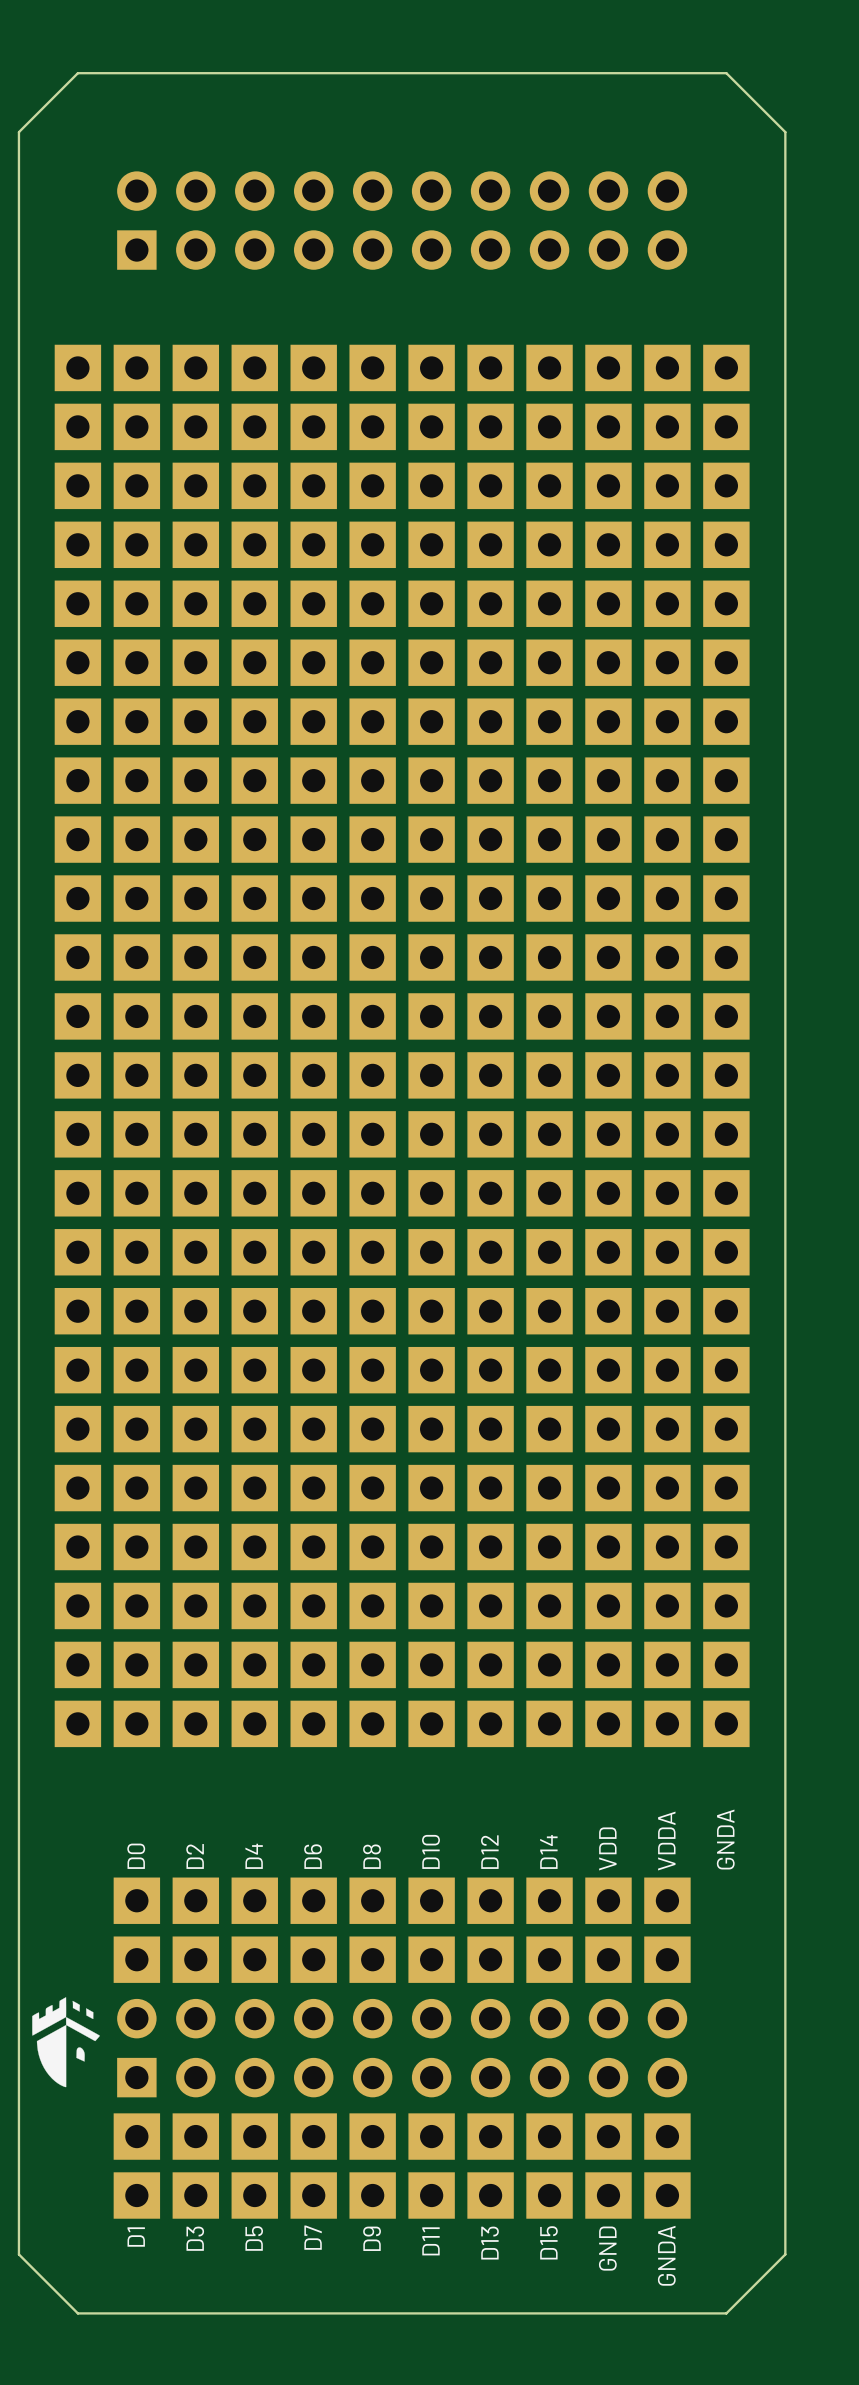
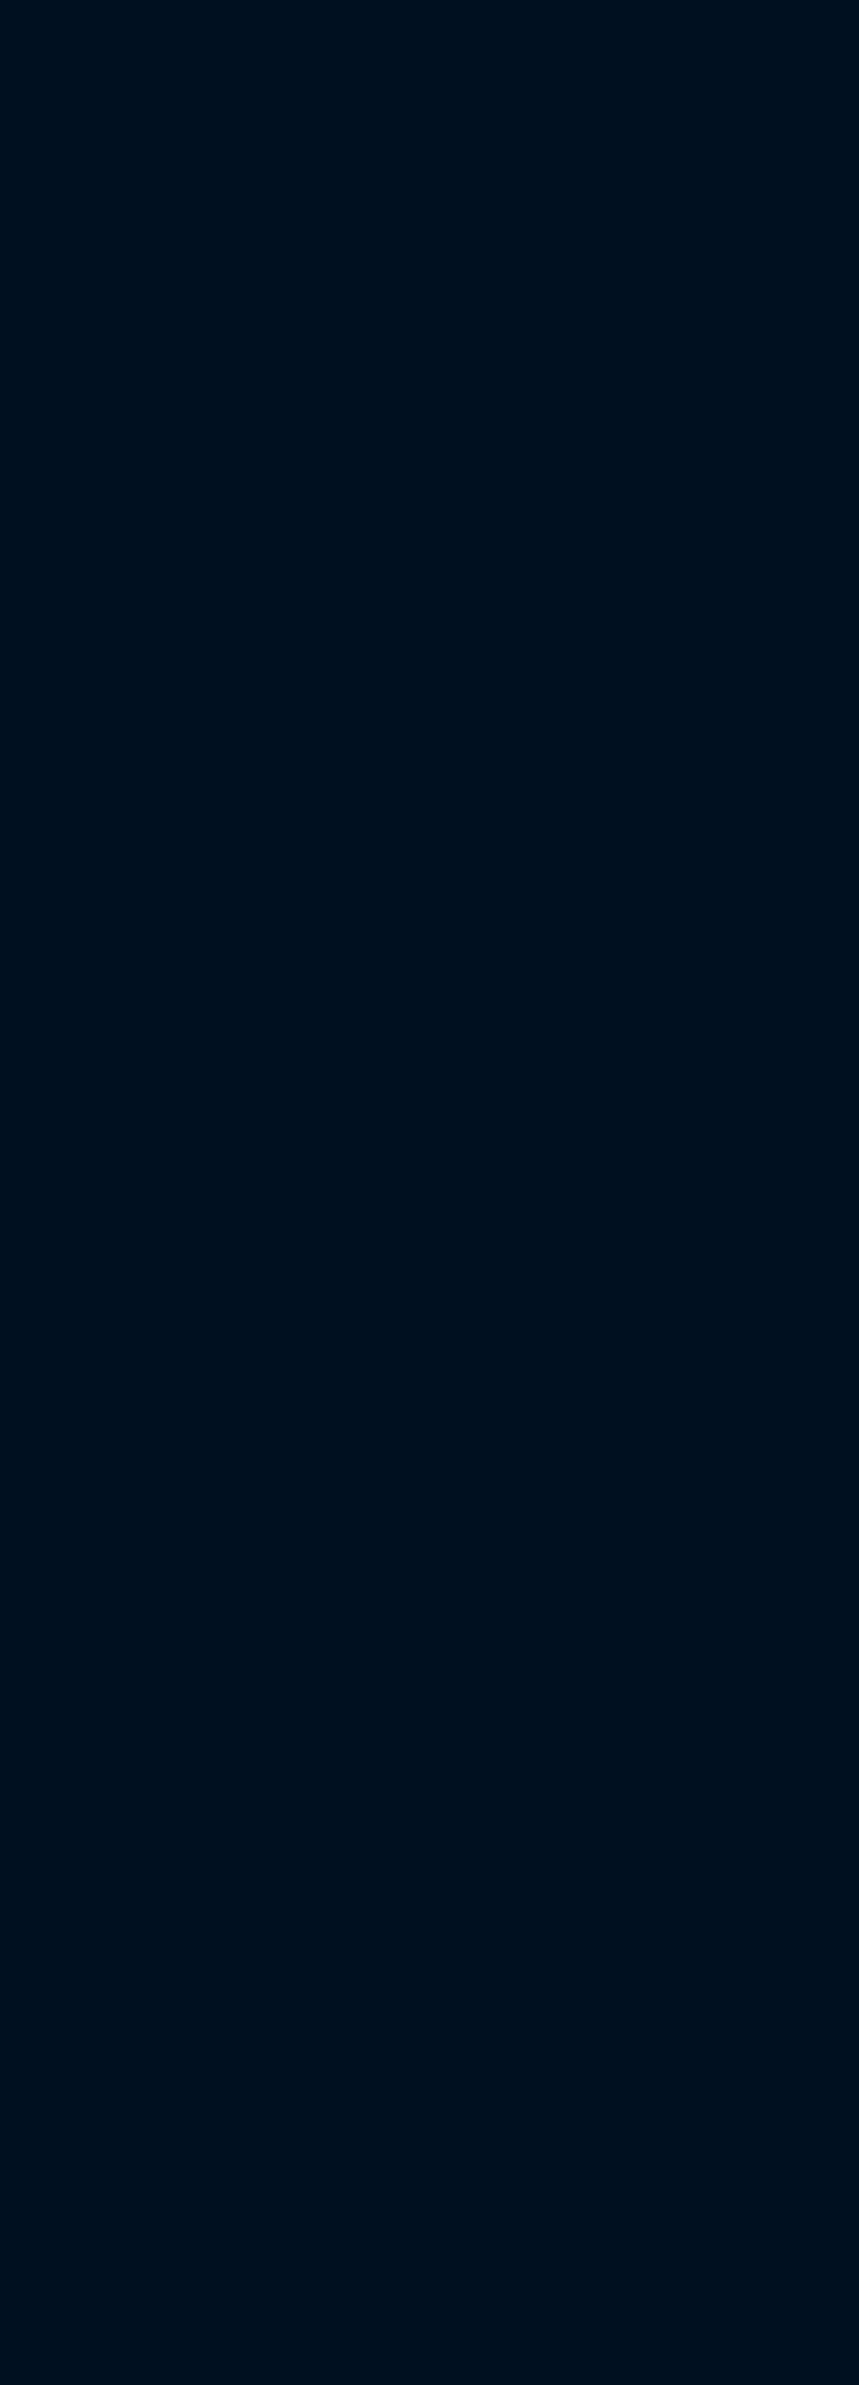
board edge: (77, 73) (726, 73) (785, 132) (785, 2254) (726, 2313) (77, 2313) (18, 2254) (18, 132) (77, 73) -> none
part: (402, 220) -> none
part: (77, 367) -> none
part: (136, 367) -> none
part: (195, 367) -> none
part: (254, 367) -> none
part: (313, 367) -> none
part: (372, 367) -> none
part: (431, 367) -> none
part: (490, 367) -> none
part: (549, 367) -> none
part: (608, 367) -> none
part: (667, 367) -> none
part: (726, 367) -> none
part: (77, 426) -> none
part: (136, 426) -> none
part: (195, 426) -> none
part: (254, 426) -> none
part: (313, 426) -> none
part: (372, 426) -> none
part: (431, 426) -> none
part: (490, 426) -> none
part: (549, 426) -> none
part: (608, 426) -> none
part: (667, 426) -> none
part: (726, 426) -> none
part: (77, 485) -> none
part: (136, 485) -> none
part: (195, 485) -> none
part: (254, 485) -> none
part: (313, 485) -> none
part: (372, 485) -> none
part: (431, 485) -> none
part: (490, 485) -> none
part: (549, 485) -> none
part: (608, 485) -> none
part: (667, 485) -> none
part: (726, 485) -> none
part: (77, 544) -> none
part: (136, 544) -> none
part: (195, 544) -> none
part: (254, 544) -> none
part: (313, 544) -> none
part: (372, 544) -> none
part: (431, 544) -> none
part: (490, 544) -> none
part: (549, 544) -> none
part: (608, 544) -> none
part: (667, 544) -> none
part: (726, 544) -> none
part: (77, 603) -> none
part: (136, 603) -> none
part: (195, 603) -> none
part: (254, 603) -> none
part: (313, 603) -> none
part: (372, 603) -> none
part: (431, 603) -> none
part: (490, 603) -> none
part: (549, 603) -> none
part: (608, 603) -> none
part: (667, 603) -> none
part: (726, 603) -> none
part: (77, 662) -> none
part: (136, 662) -> none
part: (195, 662) -> none
part: (254, 662) -> none
part: (313, 662) -> none
part: (372, 662) -> none
part: (431, 662) -> none
part: (490, 662) -> none
part: (549, 662) -> none
part: (608, 662) -> none
part: (667, 662) -> none
part: (726, 662) -> none
part: (77, 721) -> none
part: (136, 721) -> none
part: (195, 721) -> none
part: (254, 721) -> none
part: (313, 721) -> none
part: (372, 721) -> none
part: (431, 721) -> none
part: (490, 721) -> none
part: (549, 721) -> none
part: (608, 721) -> none
part: (667, 721) -> none
part: (726, 721) -> none
part: (77, 780) -> none
part: (136, 780) -> none
part: (195, 780) -> none
part: (254, 780) -> none
part: (313, 780) -> none
part: (372, 780) -> none
part: (431, 780) -> none
part: (490, 780) -> none
part: (549, 780) -> none
part: (608, 780) -> none
part: (667, 780) -> none
part: (726, 780) -> none
part: (77, 839) -> none
part: (136, 839) -> none
part: (195, 839) -> none
part: (254, 839) -> none
part: (313, 839) -> none
part: (372, 839) -> none
part: (431, 839) -> none
part: (490, 839) -> none
part: (549, 839) -> none
part: (608, 839) -> none
part: (667, 839) -> none
part: (726, 839) -> none
part: (77, 898) -> none
part: (136, 898) -> none
part: (195, 898) -> none
part: (254, 898) -> none
part: (313, 898) -> none
part: (372, 898) -> none
part: (431, 898) -> none
part: (490, 898) -> none
part: (549, 898) -> none
part: (608, 898) -> none
part: (667, 898) -> none
part: (726, 898) -> none
part: (77, 957) -> none
part: (136, 957) -> none
part: (195, 957) -> none
part: (254, 957) -> none
part: (313, 957) -> none
part: (372, 957) -> none
part: (431, 957) -> none
part: (490, 957) -> none
part: (549, 957) -> none
part: (608, 957) -> none
part: (667, 957) -> none
part: (726, 957) -> none
part: (77, 1016) -> none
part: (136, 1016) -> none
part: (195, 1016) -> none
part: (254, 1016) -> none
part: (313, 1016) -> none
part: (372, 1016) -> none
part: (431, 1016) -> none
part: (490, 1016) -> none
part: (549, 1016) -> none
part: (608, 1016) -> none
part: (667, 1016) -> none
part: (726, 1016) -> none
part: (77, 1075) -> none
part: (136, 1075) -> none
part: (195, 1075) -> none
part: (254, 1075) -> none
part: (313, 1075) -> none
part: (372, 1075) -> none
part: (431, 1075) -> none
part: (490, 1075) -> none
part: (549, 1075) -> none
part: (608, 1075) -> none
part: (667, 1075) -> none
part: (726, 1075) -> none
part: (77, 1134) -> none
part: (136, 1134) -> none
part: (195, 1134) -> none
part: (254, 1134) -> none
part: (313, 1134) -> none
part: (372, 1134) -> none
part: (431, 1134) -> none
part: (490, 1134) -> none
part: (549, 1134) -> none
part: (608, 1134) -> none
part: (667, 1134) -> none
part: (726, 1134) -> none
part: (77, 1193) -> none
part: (136, 1193) -> none
part: (195, 1193) -> none
part: (254, 1193) -> none
part: (313, 1193) -> none
part: (372, 1193) -> none
part: (431, 1193) -> none
part: (490, 1193) -> none
part: (549, 1193) -> none
part: (608, 1193) -> none
part: (667, 1193) -> none
part: (726, 1193) -> none
part: (77, 1252) -> none
part: (136, 1252) -> none
part: (195, 1252) -> none
part: (254, 1252) -> none
part: (313, 1252) -> none
part: (372, 1252) -> none
part: (431, 1252) -> none
part: (490, 1252) -> none
part: (549, 1252) -> none
part: (608, 1252) -> none
part: (667, 1252) -> none
part: (726, 1252) -> none
part: (77, 1311) -> none
part: (136, 1311) -> none
part: (195, 1311) -> none
part: (254, 1311) -> none
part: (313, 1311) -> none
part: (372, 1311) -> none
part: (431, 1311) -> none
part: (490, 1311) -> none
part: (549, 1311) -> none
part: (608, 1311) -> none
part: (667, 1311) -> none
part: (726, 1311) -> none
part: (77, 1370) -> none
part: (136, 1370) -> none
part: (195, 1370) -> none
part: (254, 1370) -> none
part: (313, 1370) -> none
part: (372, 1370) -> none
part: (431, 1370) -> none
part: (490, 1370) -> none
part: (549, 1370) -> none
part: (608, 1370) -> none
part: (667, 1370) -> none
part: (726, 1370) -> none
part: (77, 1429) -> none
part: (136, 1429) -> none
part: (195, 1429) -> none
part: (254, 1429) -> none
part: (313, 1429) -> none
part: (372, 1429) -> none
part: (431, 1429) -> none
part: (490, 1429) -> none
part: (549, 1429) -> none
part: (608, 1429) -> none
part: (667, 1429) -> none
part: (726, 1429) -> none
part: (77, 1488) -> none
part: (136, 1488) -> none
part: (195, 1488) -> none
part: (254, 1488) -> none
part: (313, 1488) -> none
part: (372, 1488) -> none
part: (431, 1488) -> none
part: (490, 1488) -> none
part: (549, 1488) -> none
part: (608, 1488) -> none
part: (667, 1488) -> none
part: (726, 1488) -> none
part: (77, 1547) -> none
part: (136, 1547) -> none
part: (195, 1547) -> none
part: (254, 1547) -> none
part: (313, 1547) -> none
part: (372, 1547) -> none
part: (431, 1547) -> none
part: (490, 1547) -> none
part: (549, 1547) -> none
part: (608, 1547) -> none
part: (667, 1547) -> none
part: (726, 1547) -> none
part: (77, 1605) -> none
part: (136, 1605) -> none
part: (195, 1605) -> none
part: (254, 1605) -> none
part: (313, 1605) -> none
part: (372, 1605) -> none
part: (431, 1605) -> none
part: (490, 1605) -> none
part: (549, 1605) -> none
part: (608, 1605) -> none
part: (667, 1605) -> none
part: (726, 1605) -> none
part: (77, 1664) -> none
part: (136, 1664) -> none
part: (195, 1664) -> none
part: (254, 1664) -> none
part: (313, 1664) -> none
part: (372, 1664) -> none
part: (431, 1664) -> none
part: (490, 1664) -> none
part: (549, 1664) -> none
part: (608, 1664) -> none
part: (667, 1664) -> none
part: (726, 1664) -> none
part: (77, 1723) -> none
part: (136, 1723) -> none
part: (195, 1723) -> none
part: (254, 1723) -> none
part: (313, 1723) -> none
part: (372, 1723) -> none
part: (431, 1723) -> none
part: (490, 1723) -> none
part: (549, 1723) -> none
part: (608, 1723) -> none
part: (667, 1723) -> none
part: (726, 1723) -> none
text: GNDA (725, 1839) -> none
text: VDDA (666, 1841) -> none
text: VDD (607, 1848) -> none
text: D10 (430, 1851) -> none
text: D14 (548, 1851) -> none
text: D12 (489, 1852) -> none
text: D0 (136, 1856) -> none
text: D2 (195, 1856) -> none
text: D4 (254, 1856) -> none
text: D6 (313, 1856) -> none
text: D8 (372, 1856) -> none
part: (136, 1900) -> none
part: (195, 1900) -> none
part: (254, 1900) -> none
part: (313, 1900) -> none
part: (372, 1900) -> none
part: (431, 1900) -> none
part: (490, 1900) -> none
part: (549, 1900) -> none
part: (608, 1900) -> none
part: (667, 1900) -> none
part: (136, 1959) -> none
part: (195, 1959) -> none
part: (254, 1959) -> none
part: (313, 1959) -> none
part: (372, 1959) -> none
part: (431, 1959) -> none
part: (490, 1959) -> none
part: (549, 1959) -> none
part: (608, 1959) -> none
part: (667, 1959) -> none
drawing: [32, 1997, 100, 2088] -> none
part: (402, 2048) -> none
part: (136, 2136) -> none
part: (195, 2136) -> none
part: (254, 2136) -> none
part: (313, 2136) -> none
part: (372, 2136) -> none
part: (431, 2136) -> none
part: (490, 2136) -> none
part: (549, 2136) -> none
part: (608, 2136) -> none
part: (667, 2136) -> none
part: (136, 2195) -> none
part: (195, 2195) -> none
part: (254, 2195) -> none
part: (313, 2195) -> none
part: (372, 2195) -> none
part: (431, 2195) -> none
part: (490, 2195) -> none
part: (549, 2195) -> none
part: (608, 2195) -> none
part: (667, 2195) -> none
text: D1 (136, 2237) -> none
text: D7 (313, 2237) -> none
text: D3 (195, 2238) -> none
text: D5 (254, 2238) -> none
text: D9 (372, 2238) -> none
text: D11 (430, 2241) -> none
text: D15 (548, 2242) -> none
text: D13 (490, 2243) -> none
text: GND (607, 2248) -> none
text: GNDA (666, 2255) -> none

